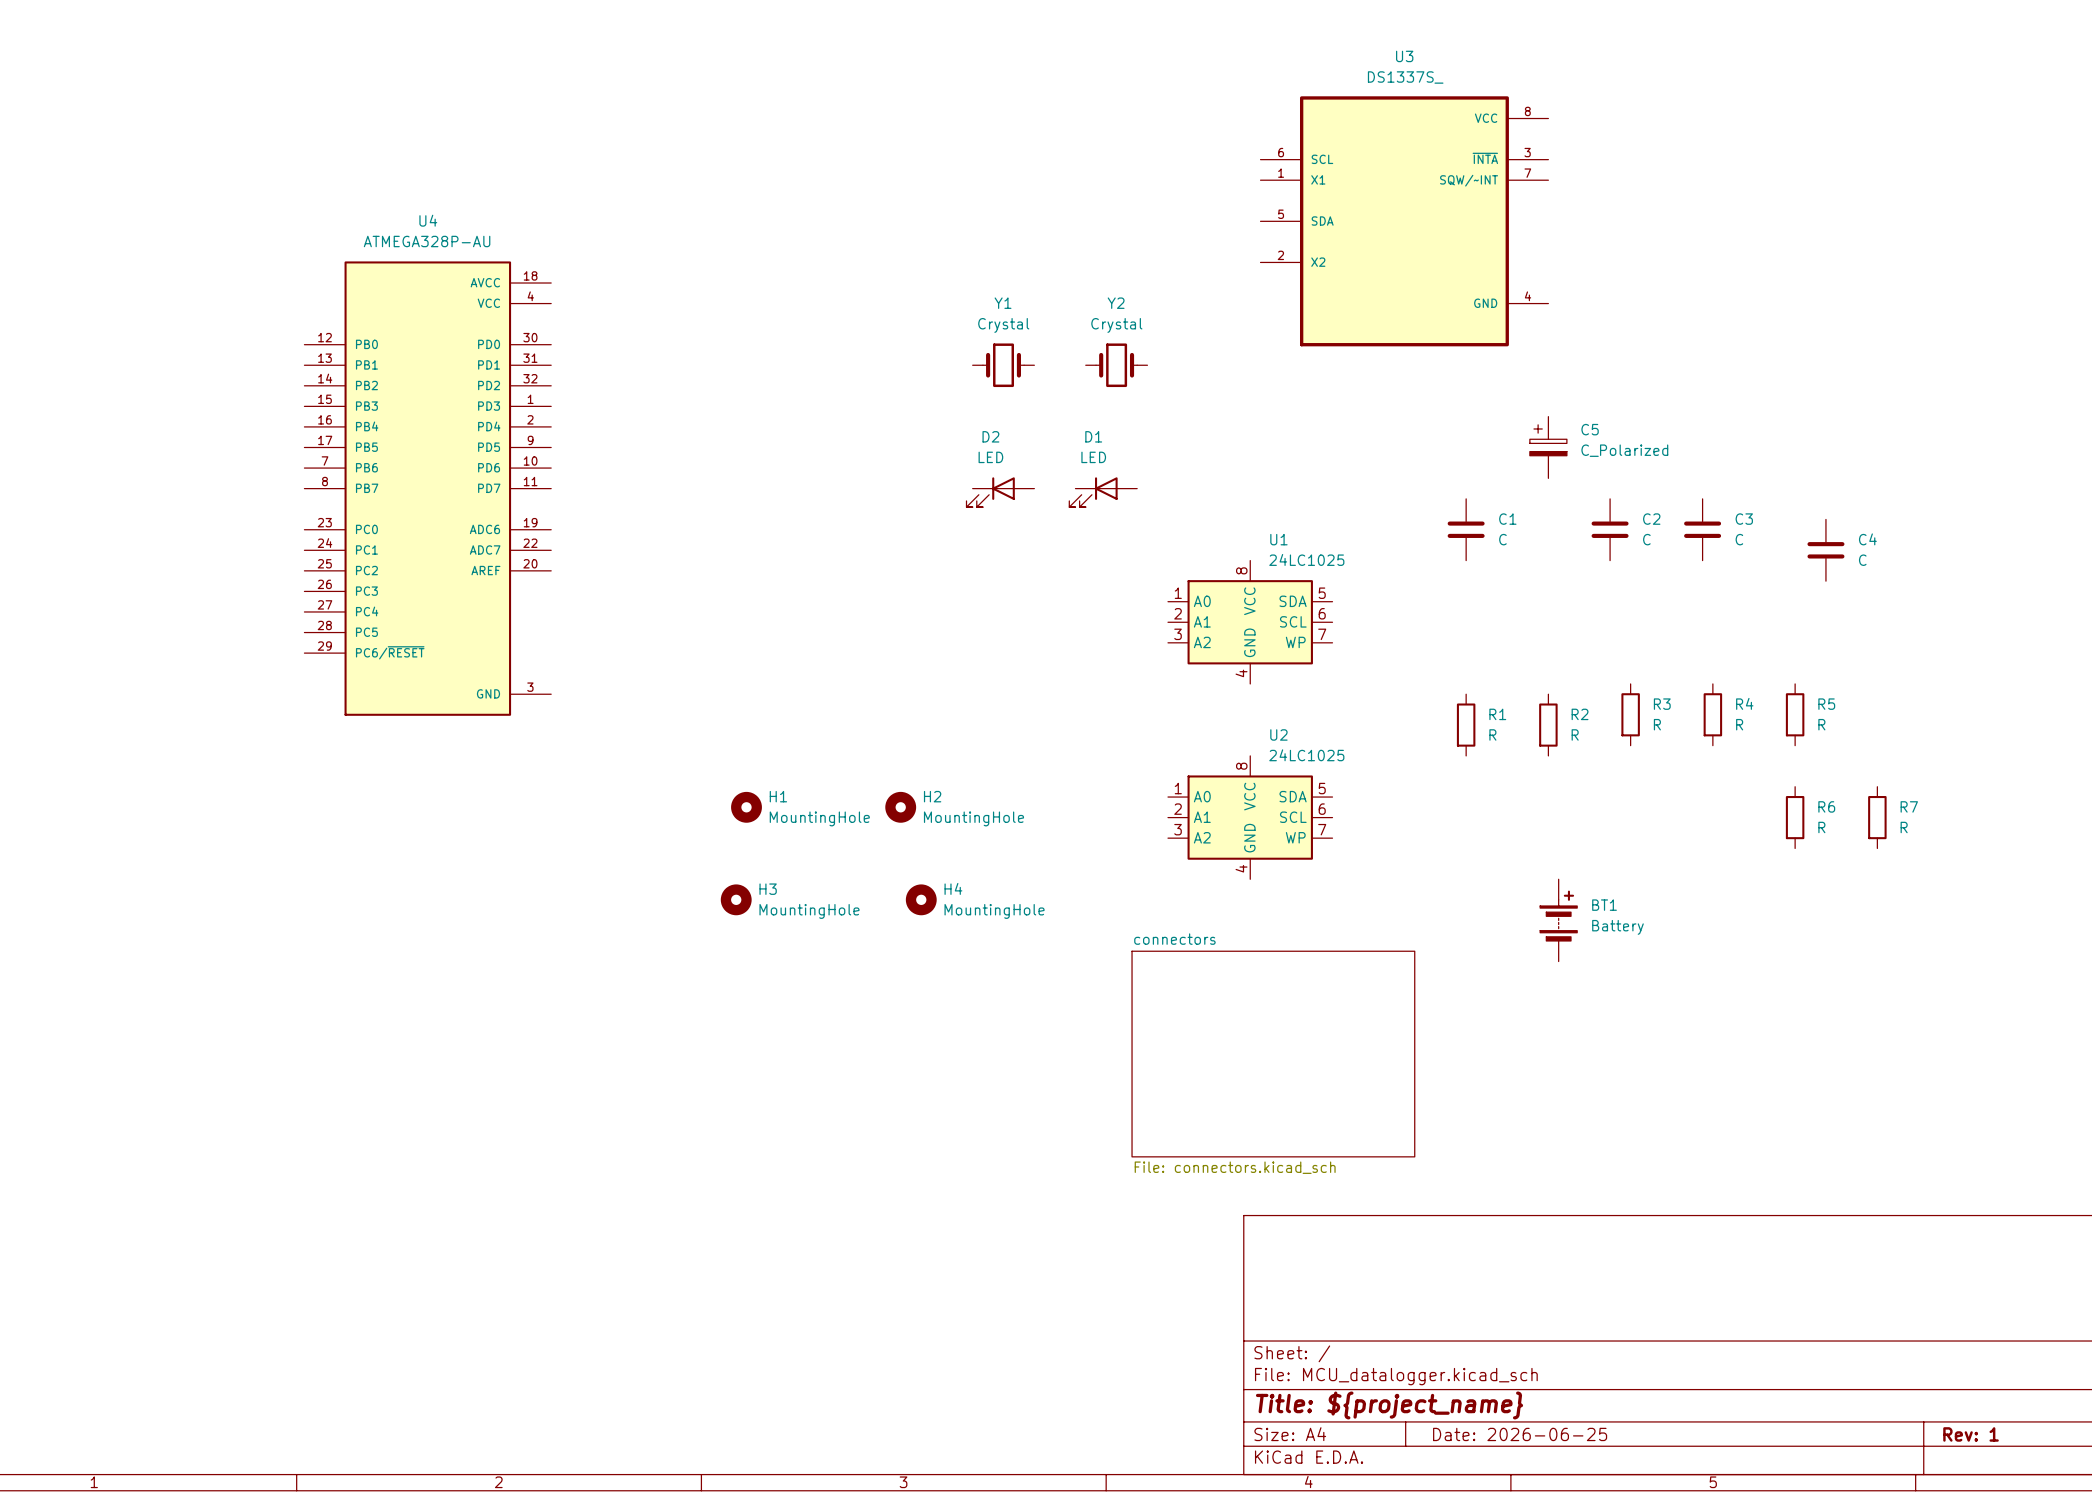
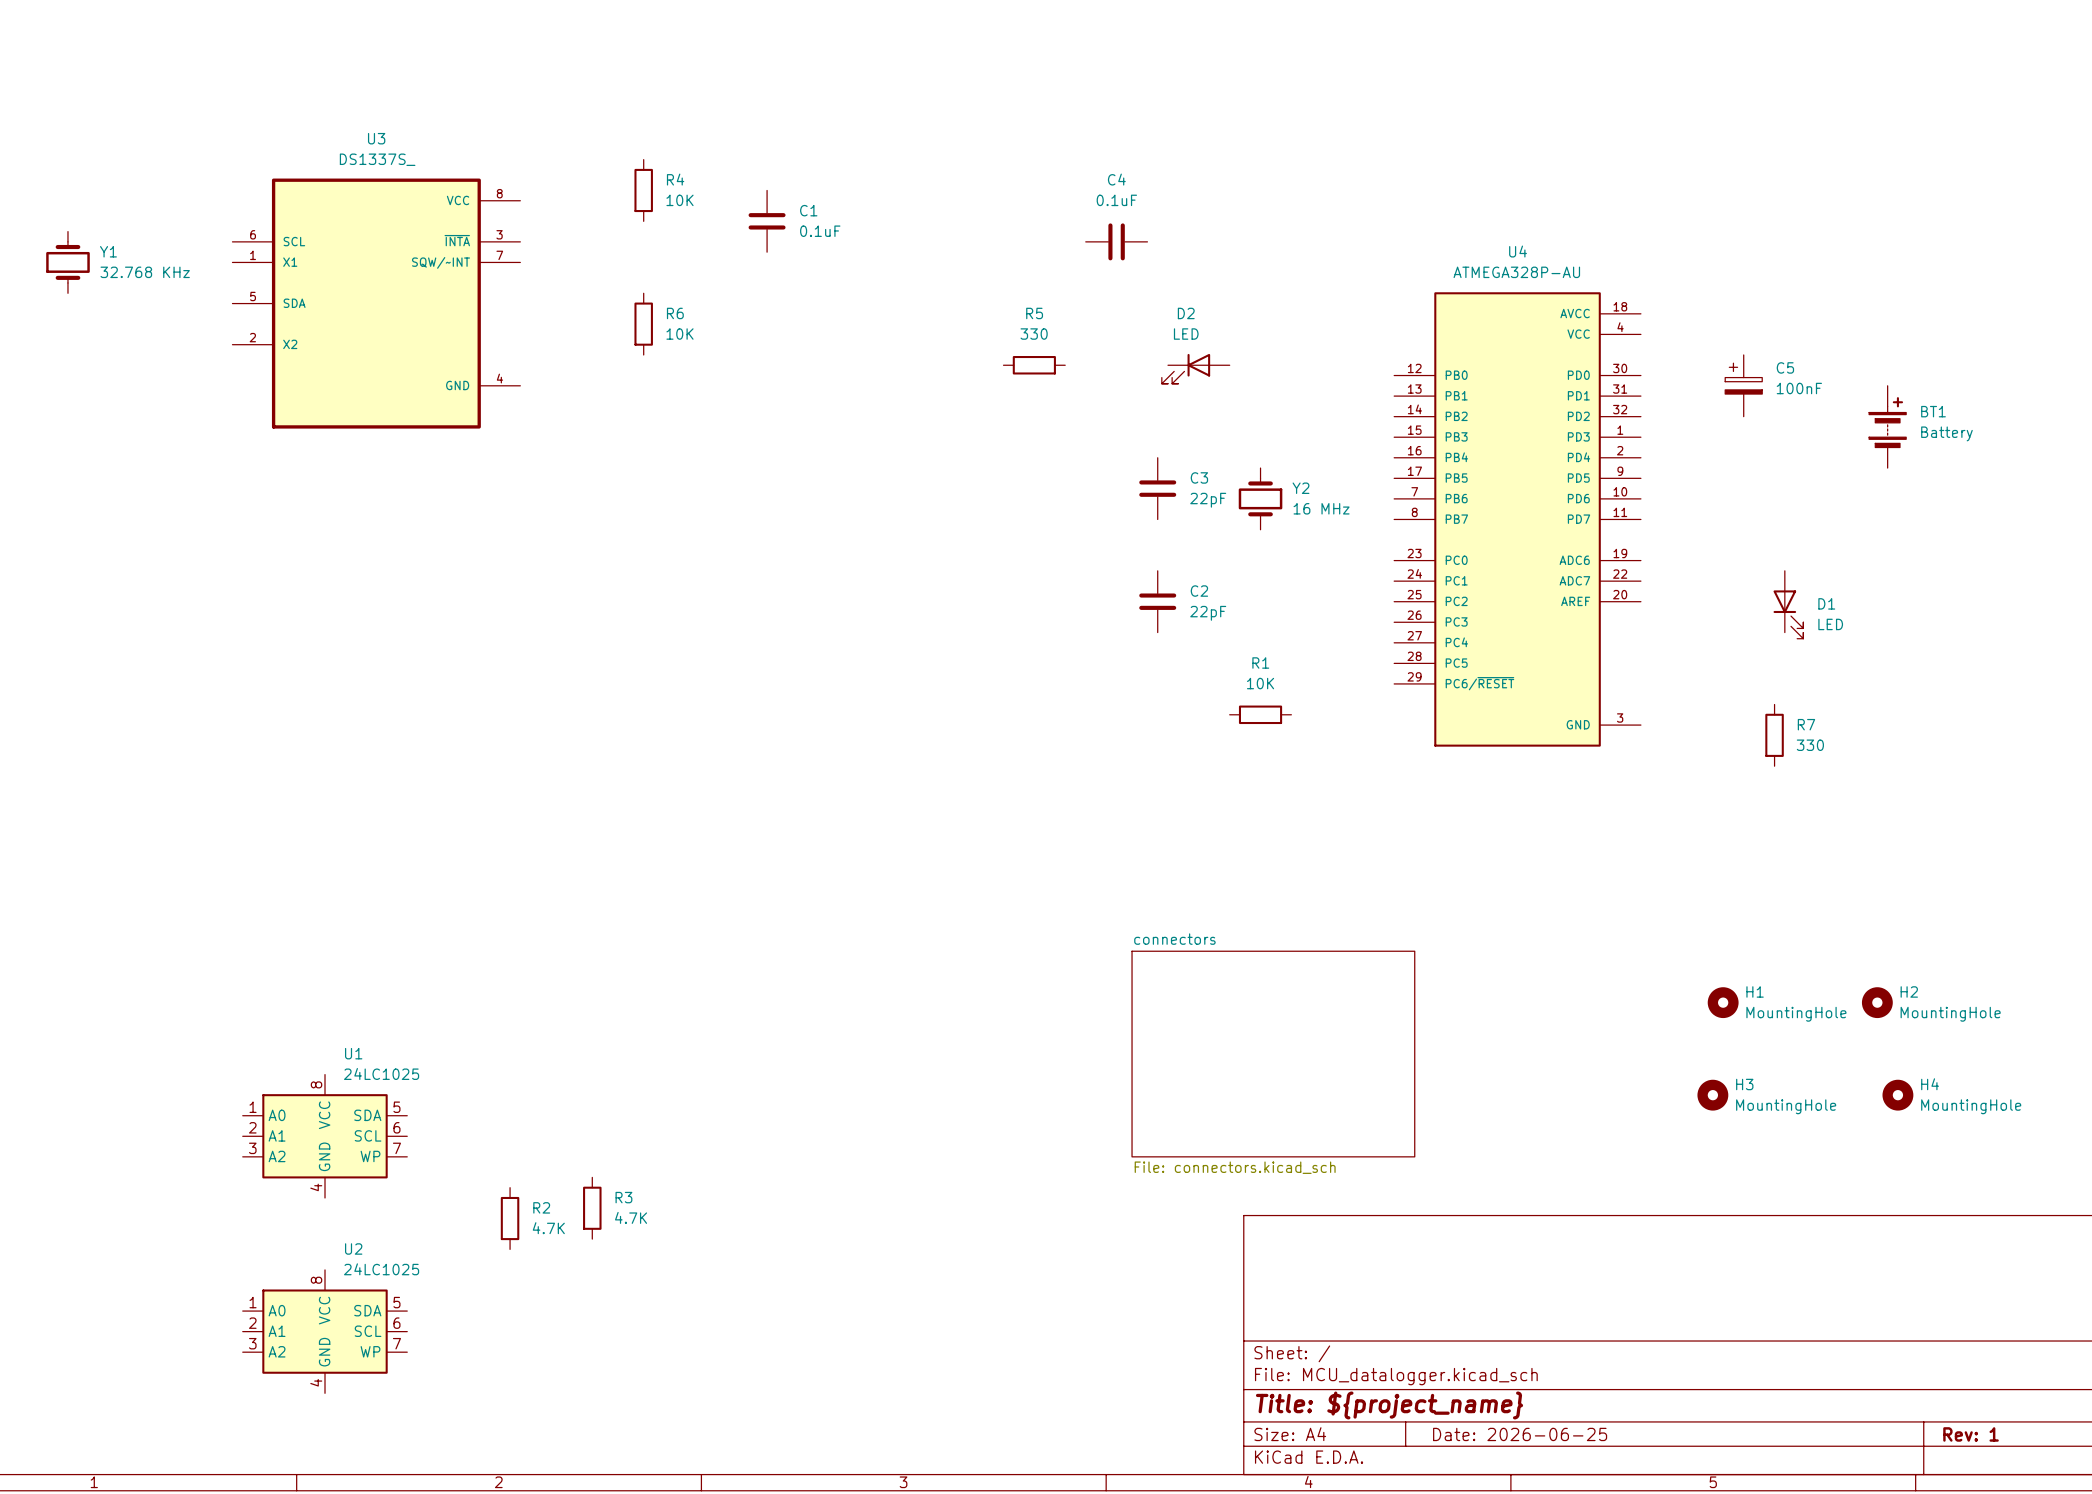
U3 position: (1404, 221) -> (376, 303)
Y1 name position: Y1 (1003, 303) -> Y1 (108, 251)
Y2 name position: Y2 (1116, 303) -> Y2 (1300, 488)
Y1 value: Crystal (1003, 325) -> 32.768 KHz (145, 272)
Y2 value: Crystal (1116, 325) -> 16 MHz (1321, 508)
Y1 rotation: 0° (1003, 365) -> 90° clockwise (67, 262)
Y1 position: (1003, 365) -> (67, 262)
Y2 rotation: 0° (1116, 365) -> 90° clockwise (1260, 498)
Y2 position: (1116, 365) -> (1260, 498)
D1 name position: D1 (1093, 436) -> D1 (1826, 603)
C5 position: (1548, 447) -> (1743, 385)
C5 value: C_Polarized (1624, 450) -> 100nF (1799, 388)
D1 value position: LED (1093, 457) -> LED (1830, 624)
U4 position: (427, 488) -> (1517, 519)
D2 position: (1000, 492) -> (1195, 368)
D1 rotation: 0° (1093, 492) -> 90° counterclockwise (1788, 614)
D1 position: (1103, 492) -> (1788, 604)
C1 position: (1466, 529) -> (767, 221)
C2 position: (1610, 529) -> (1157, 601)
C3 position: (1702, 529) -> (1157, 488)
C1 value: C (1502, 539) -> 0.1uF (820, 231)
C2 value: C (1646, 539) -> 22pF (1208, 613)
C3 value: C (1739, 539) -> 22pF (1208, 500)
C4 name position: C4 (1867, 539) -> C4 (1116, 179)
C4 rotation: 0° (1825, 550) -> 90° clockwise (1116, 241)
C4 position: (1825, 550) -> (1116, 241)
C4 value: C (1862, 560) -> 0.1uF (1116, 200)
U1 position: (1250, 622) -> (325, 1136)
R5 name position: R5 (1826, 704) -> R5 (1034, 313)
R1 name position: R1 (1497, 714) -> R1 (1260, 663)
R3 position: (1630, 714) -> (592, 1208)
R4 position: (1712, 714) -> (643, 190)
R5 rotation: 0° (1795, 714) -> 90° clockwise (1034, 365)
R5 position: (1795, 714) -> (1034, 365)
R3 value: R (1657, 724) -> 4.7K (631, 1217)
R4 value: R (1739, 724) -> 10K (680, 200)
R5 value: R (1821, 724) -> 330 (1034, 334)
R1 rotation: 0° (1466, 725) -> 90° clockwise (1260, 714)
R1 position: (1466, 725) -> (1260, 714)
R2 position: (1548, 725) -> (510, 1218)
R1 value: R (1492, 734) -> 10K (1260, 683)
R2 value: R (1575, 734) -> 4.7K (548, 1228)
H1 position: (746, 807) -> (1723, 1002)
H2 position: (900, 807) -> (1877, 1002)
U2 position: (1250, 817) -> (325, 1331)
R6 position: (1795, 817) -> (643, 324)
R7 position: (1877, 817) -> (1774, 735)
R6 value: R (1821, 827) -> 10K (680, 334)
R7 value: R (1904, 827) -> 330 (1810, 745)
H3 position: (736, 899) -> (1712, 1095)
H4 position: (921, 899) -> (1897, 1095)
BT1 position: (1558, 920) -> (1887, 426)

